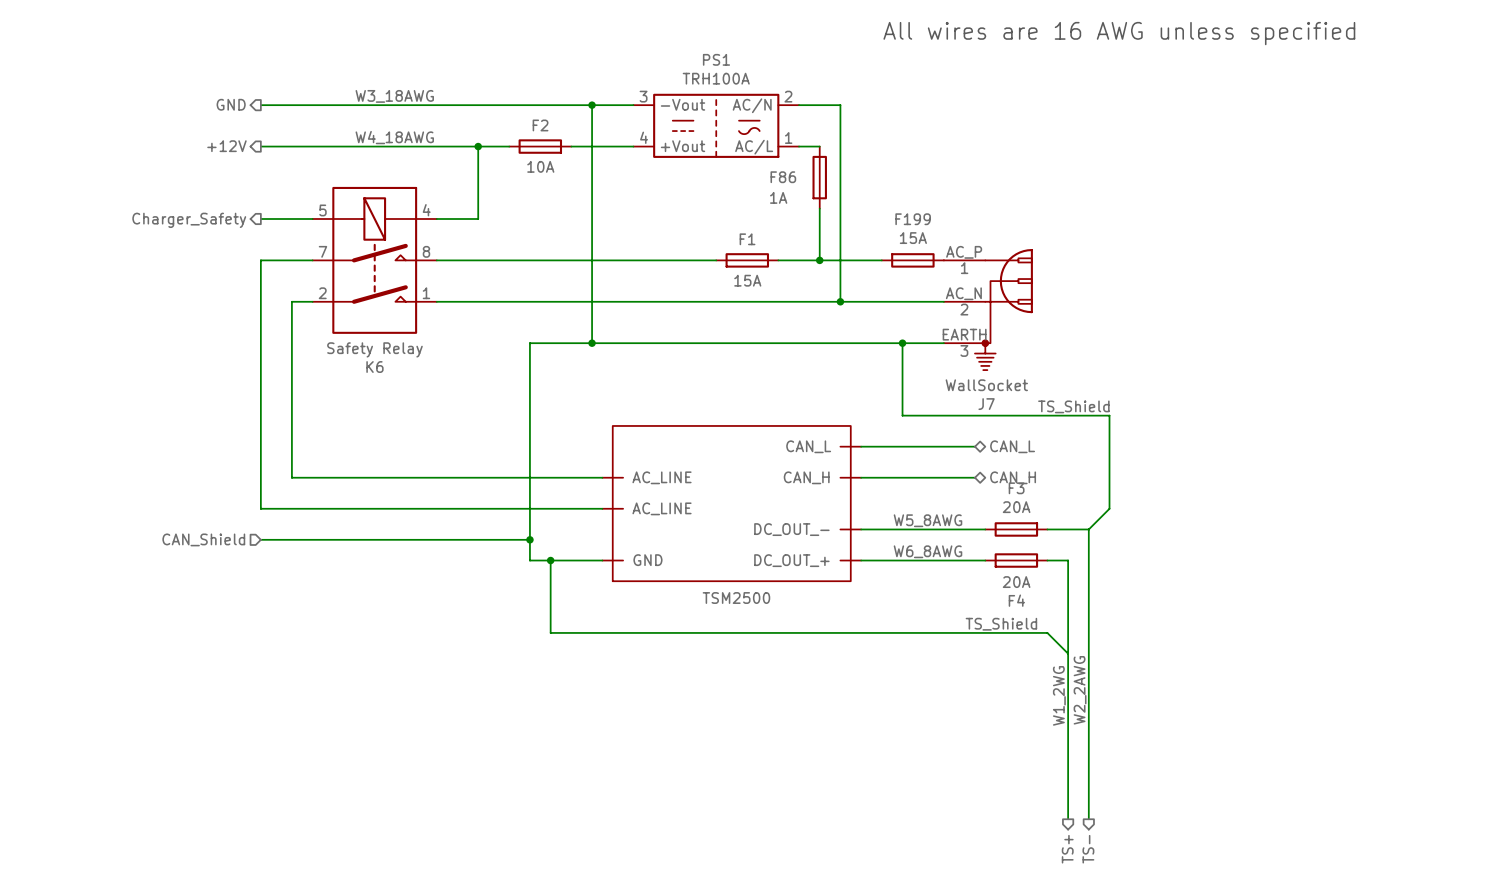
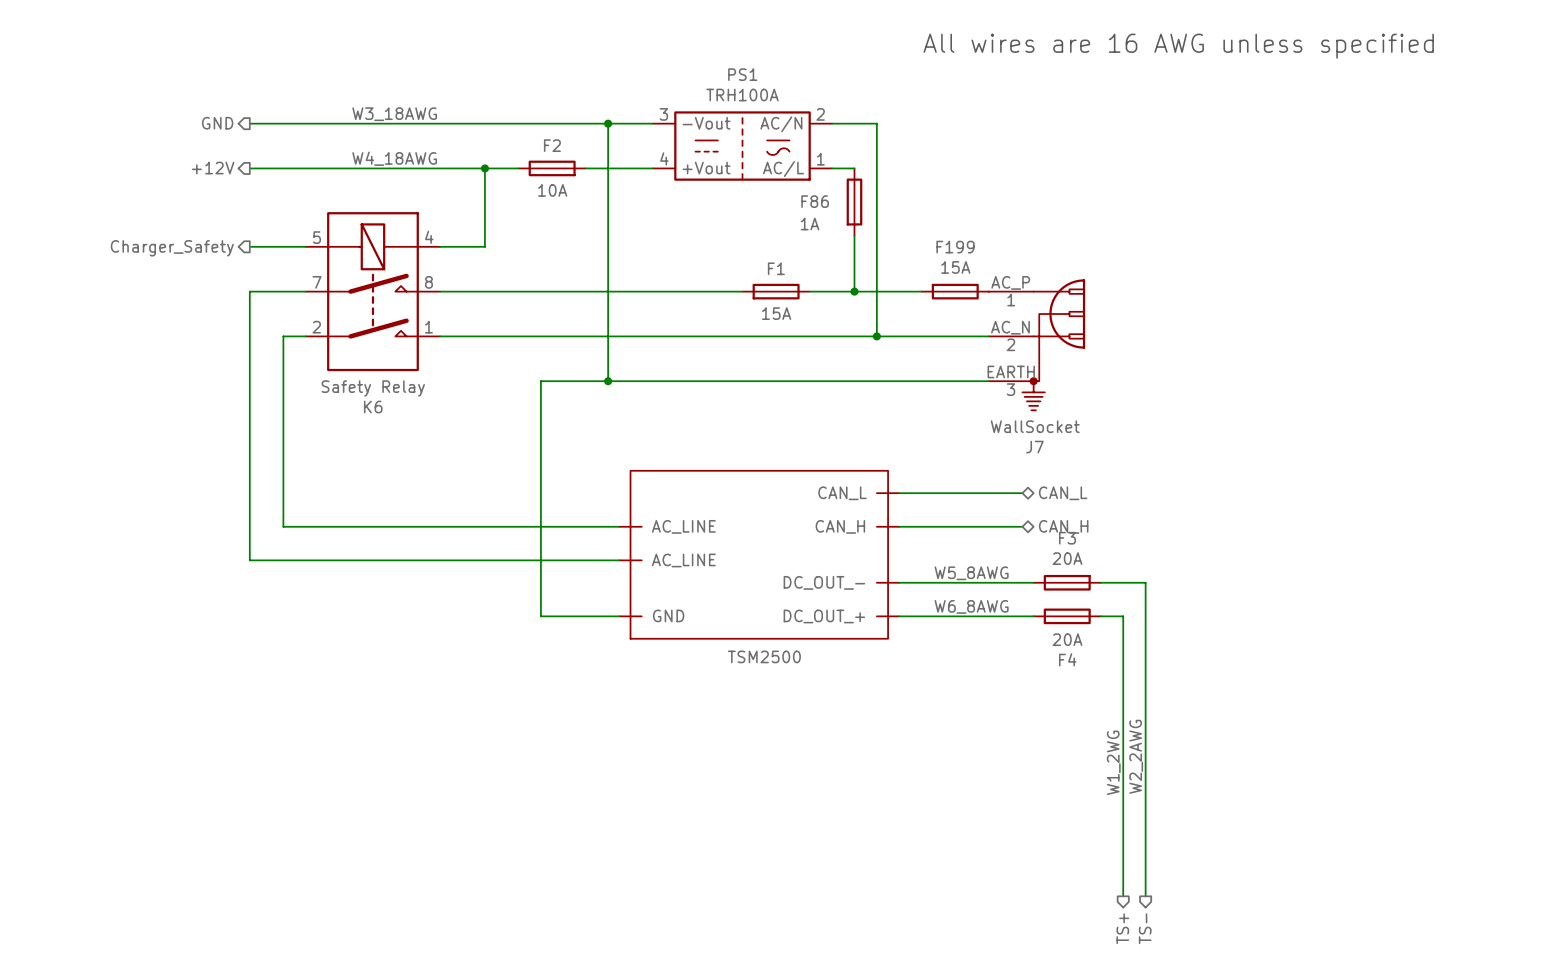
wire: (902, 343) (902, 415) (1109, 415) (1109, 508) (1088, 529) -> none
junction: (902, 343) -> none
label: TS_Shield (1073, 406) -> none
hierarchical label: CAN_Shield (203, 539) -> none
wire: (260, 539) (529, 539) -> none
junction: (529, 539) -> none
wire: (550, 560) (550, 632) (1047, 632) (1068, 653) -> none
junction: (550, 560) -> none
label: TS_Shield (1001, 624) -> none

